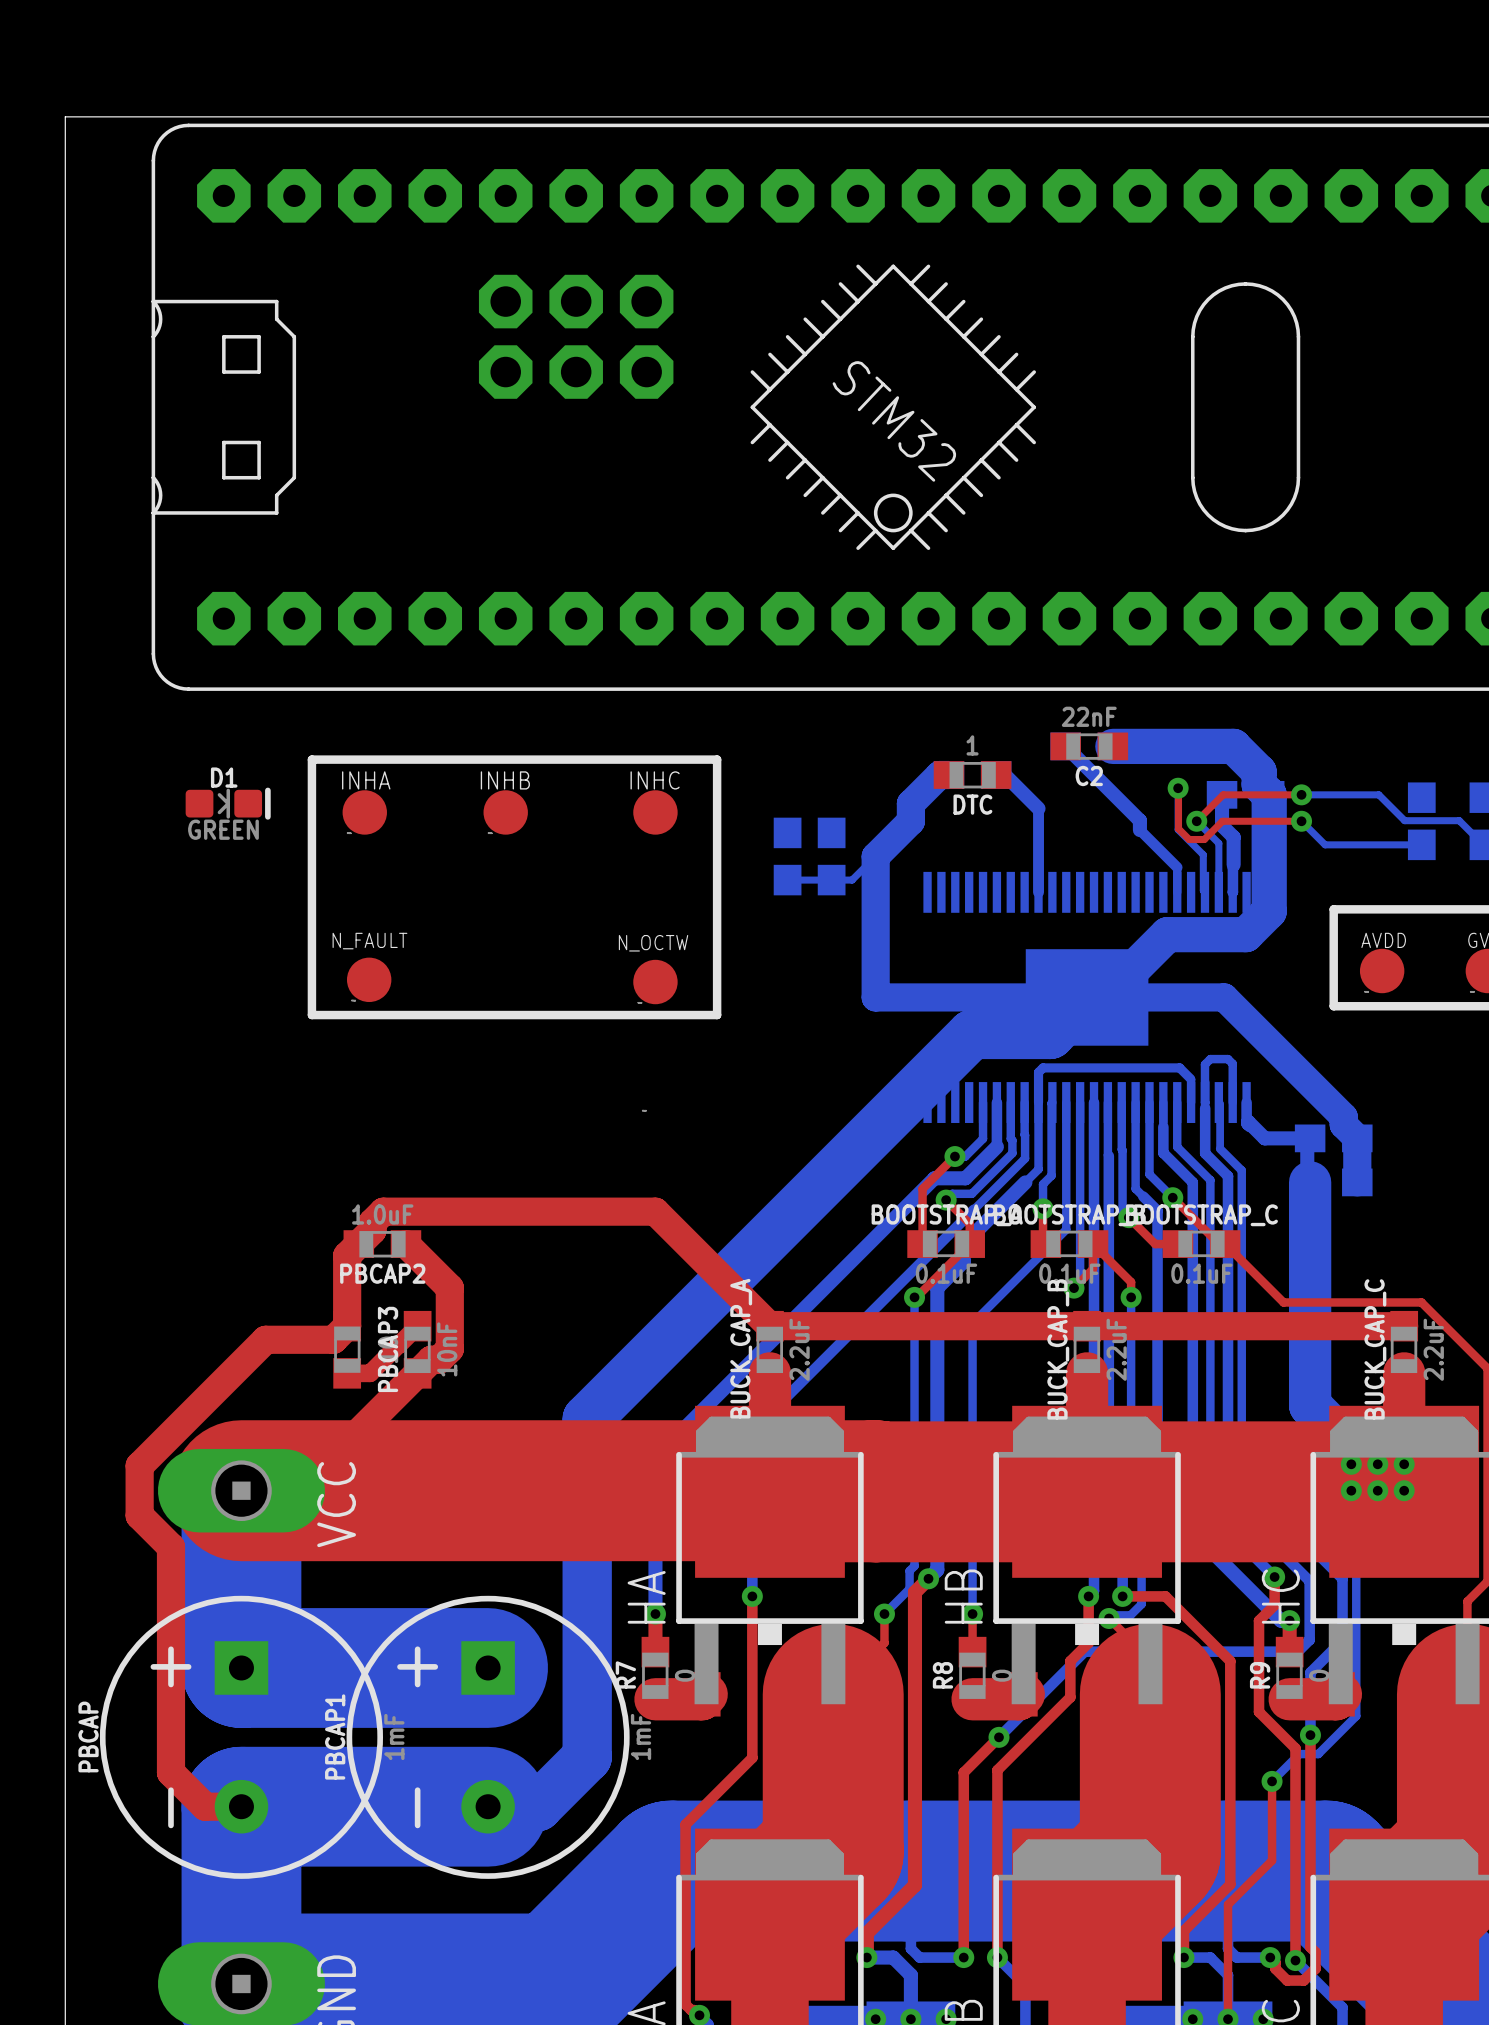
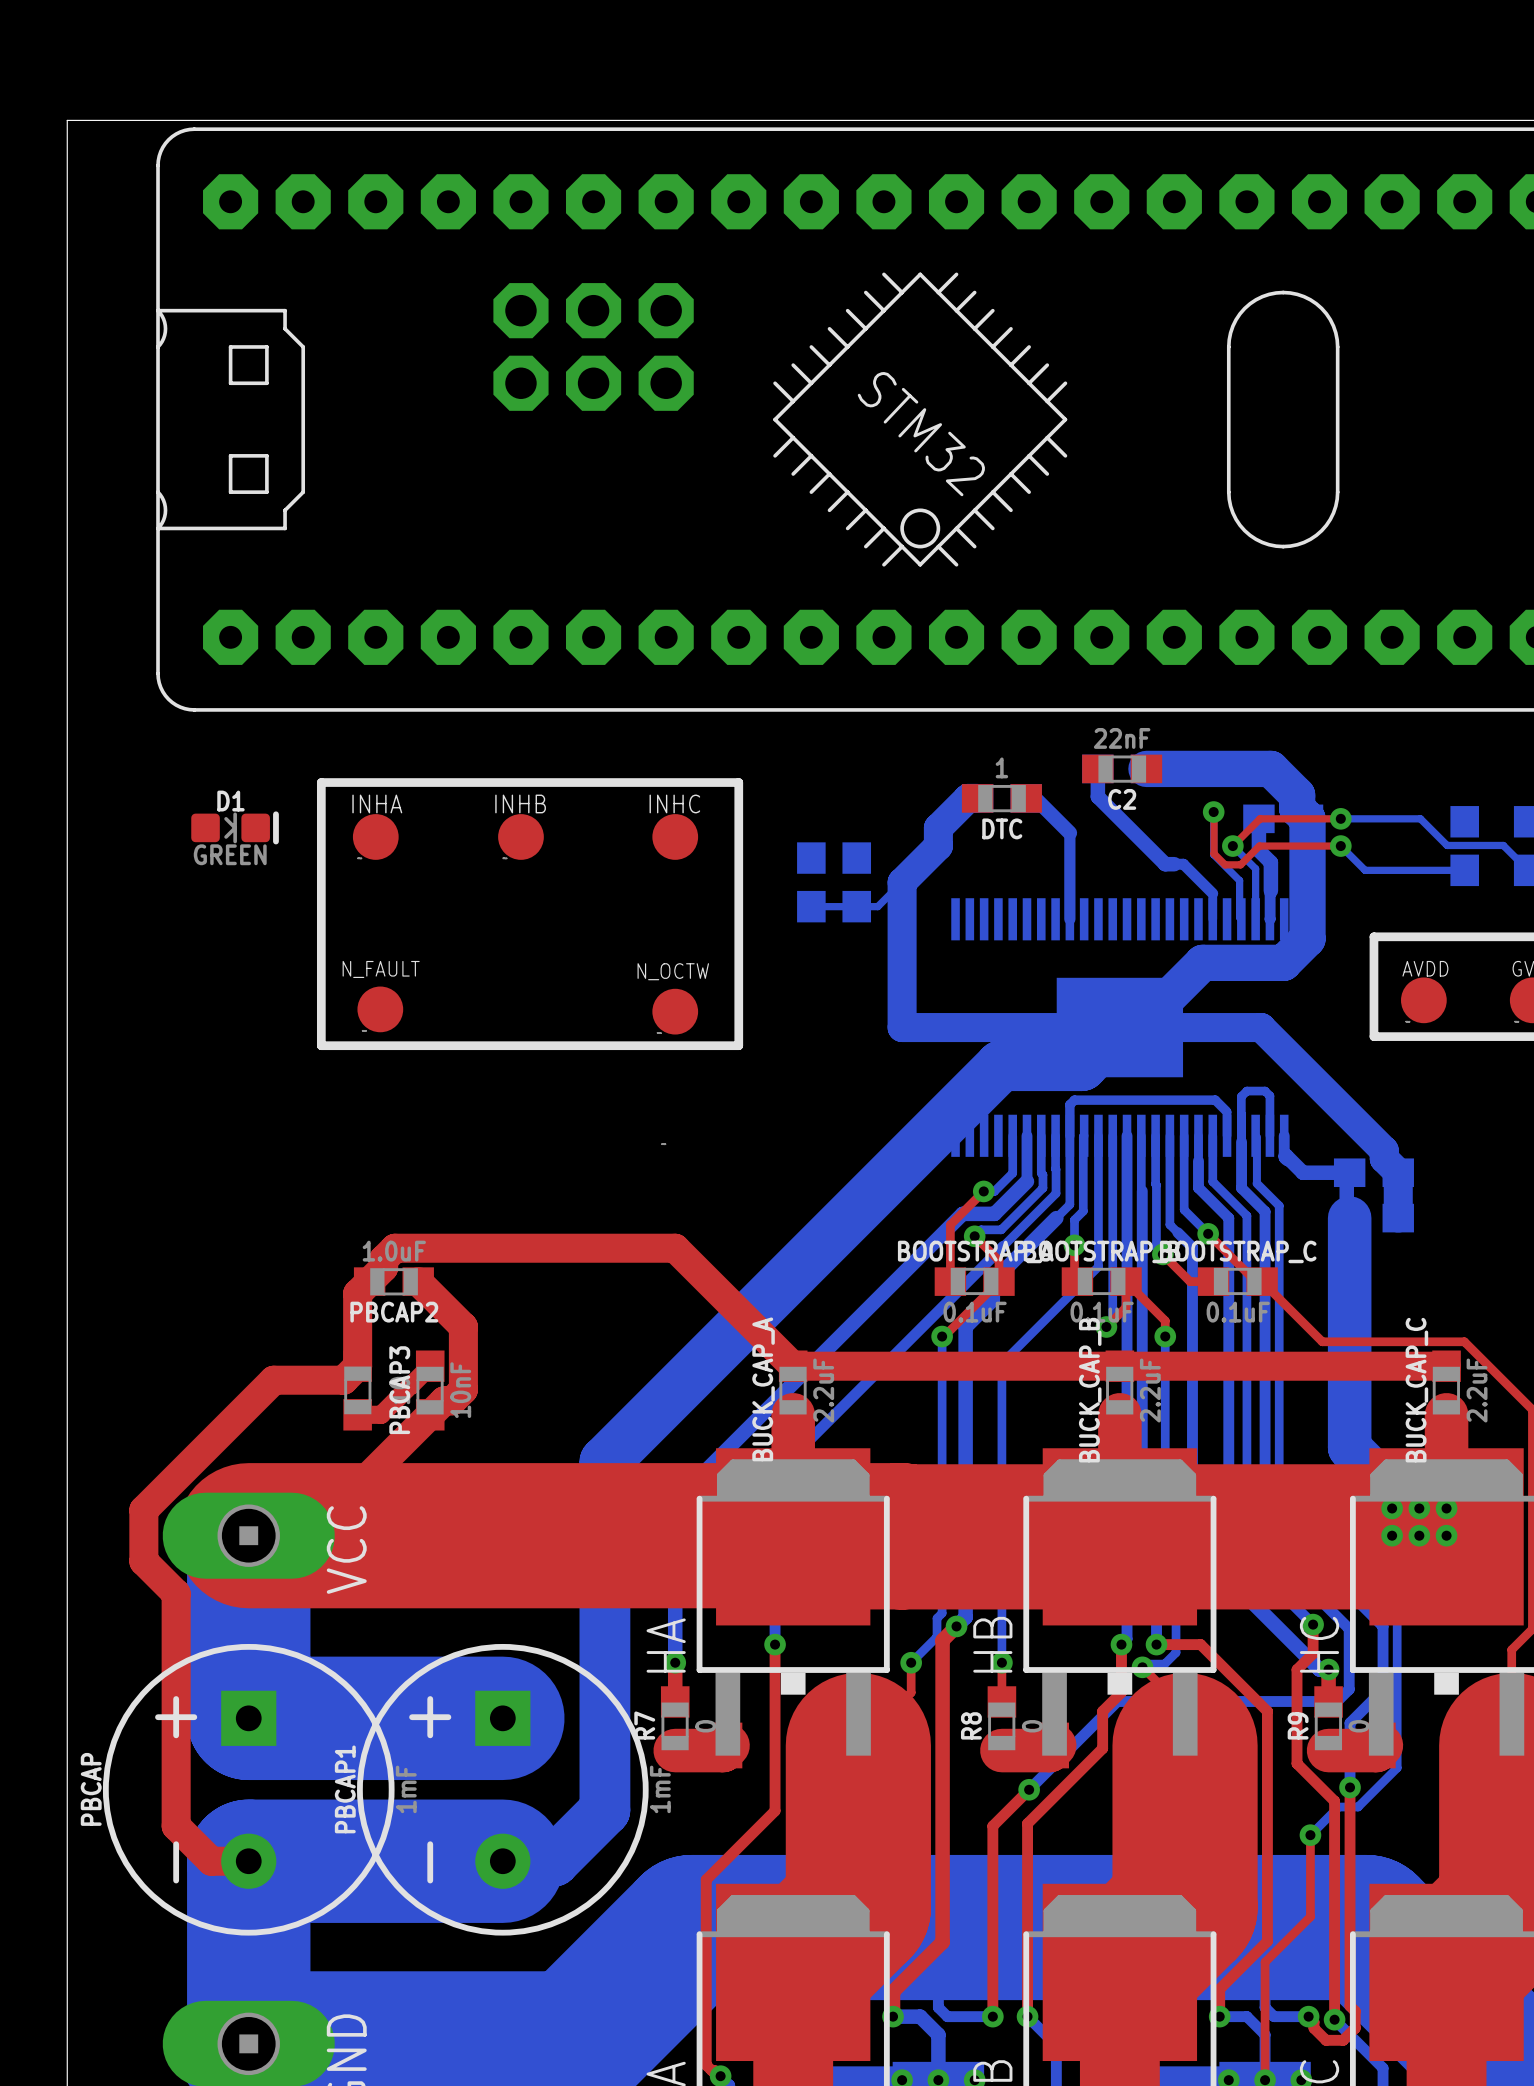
bottom track: (1065, 746) (1139, 820) (1139, 830) (1148, 838) -> (1097, 768) (1097, 796) (1165, 864) (1183, 864)

